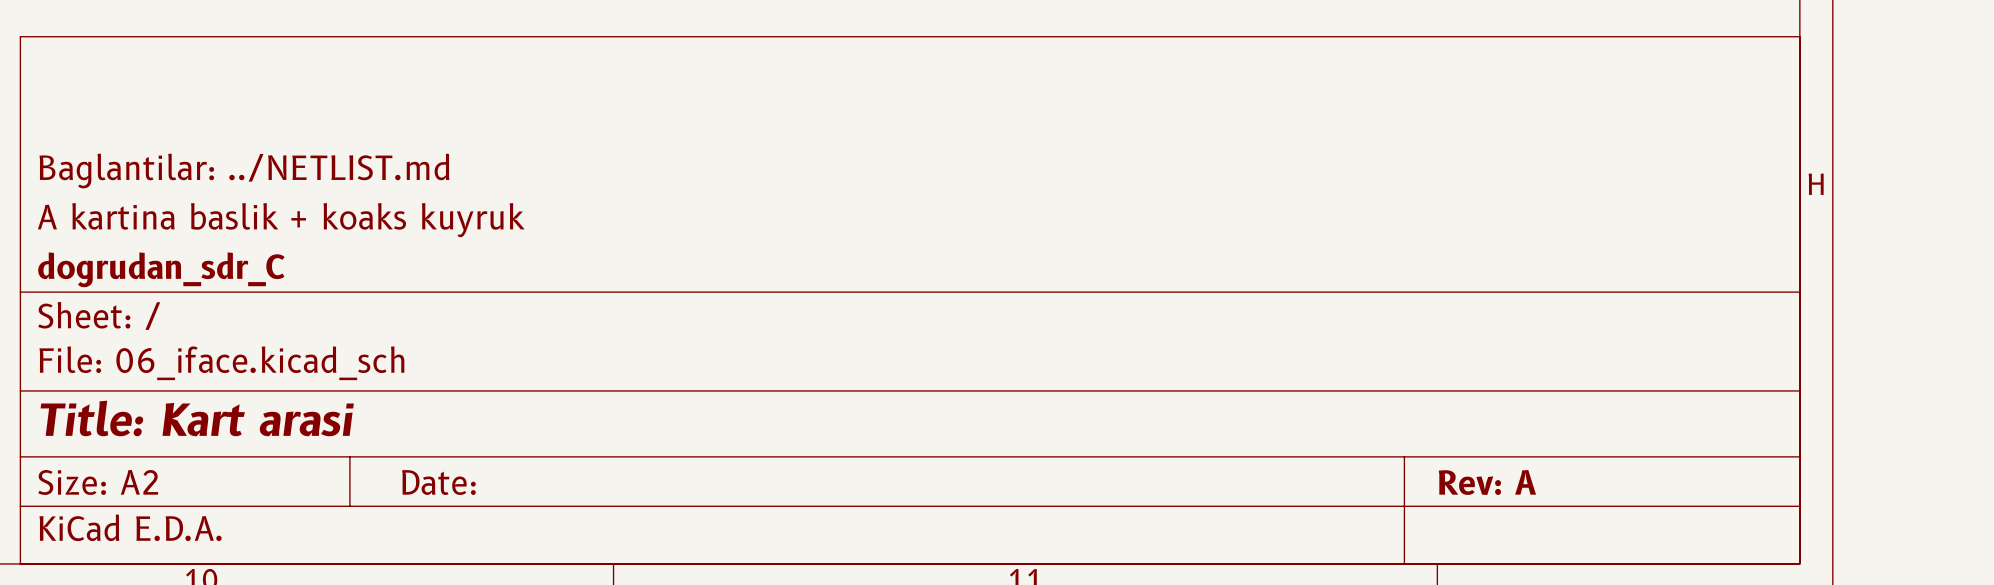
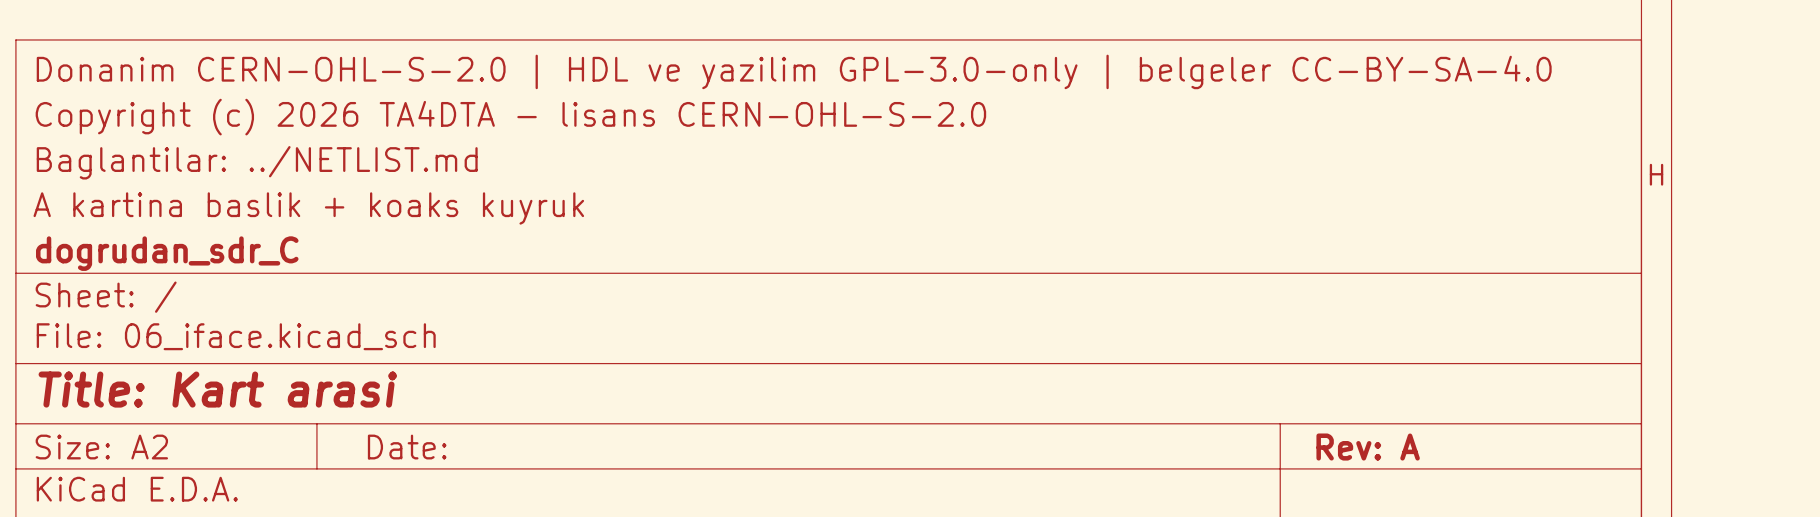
title block: none -> Donanim CERN-OHL-S-2.0 | HDL ve yazilim GPL-3.0-only | belgeler CC-BY-SA-4.0 (794, 71)
title block: none -> Copyright (c) 2026 TA4DTA - lisans CERN-OHL-S-2.0 (510, 117)

